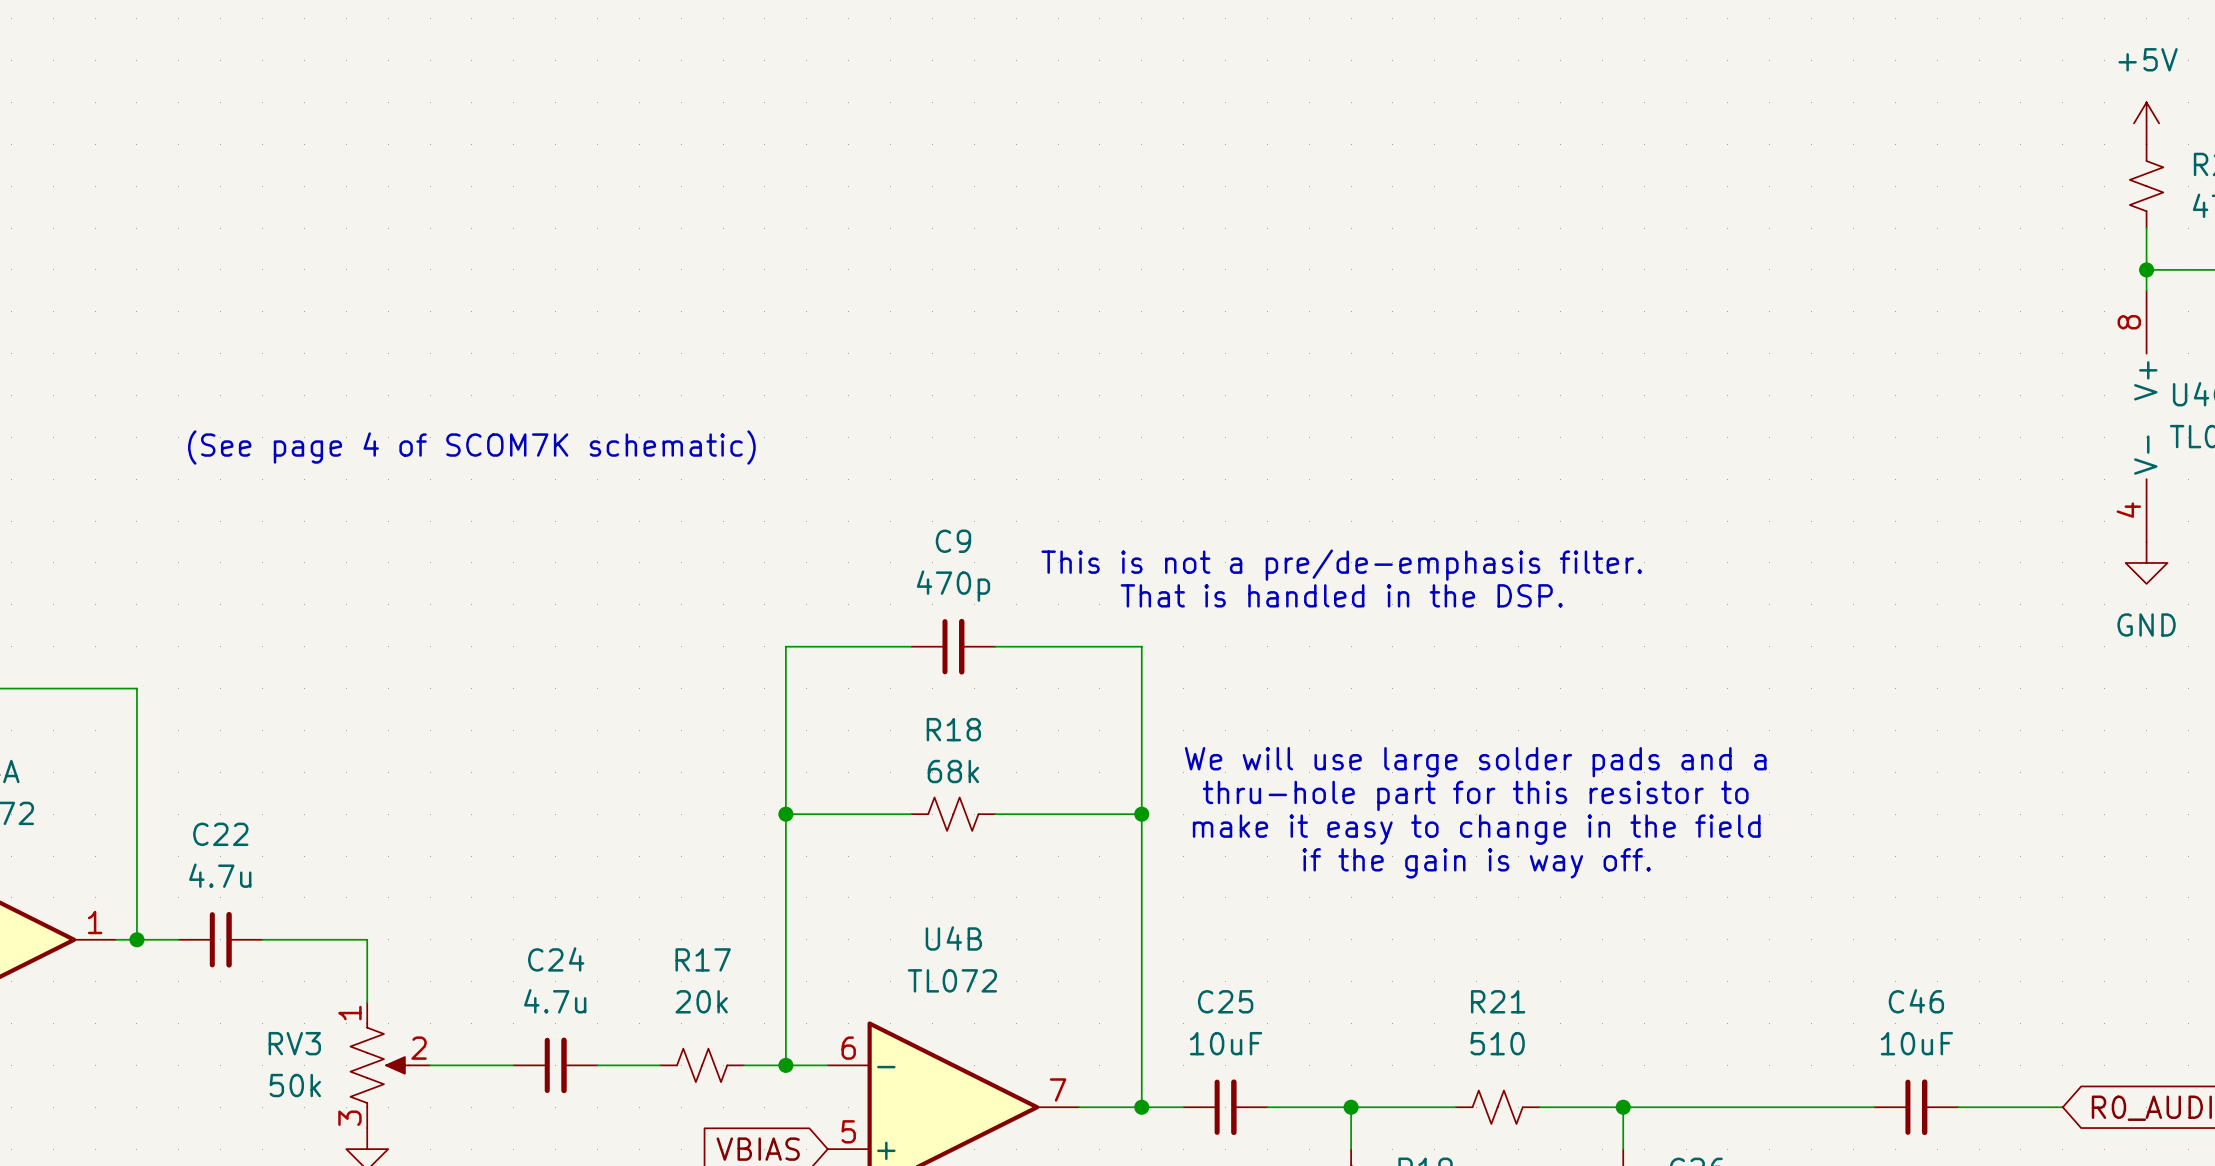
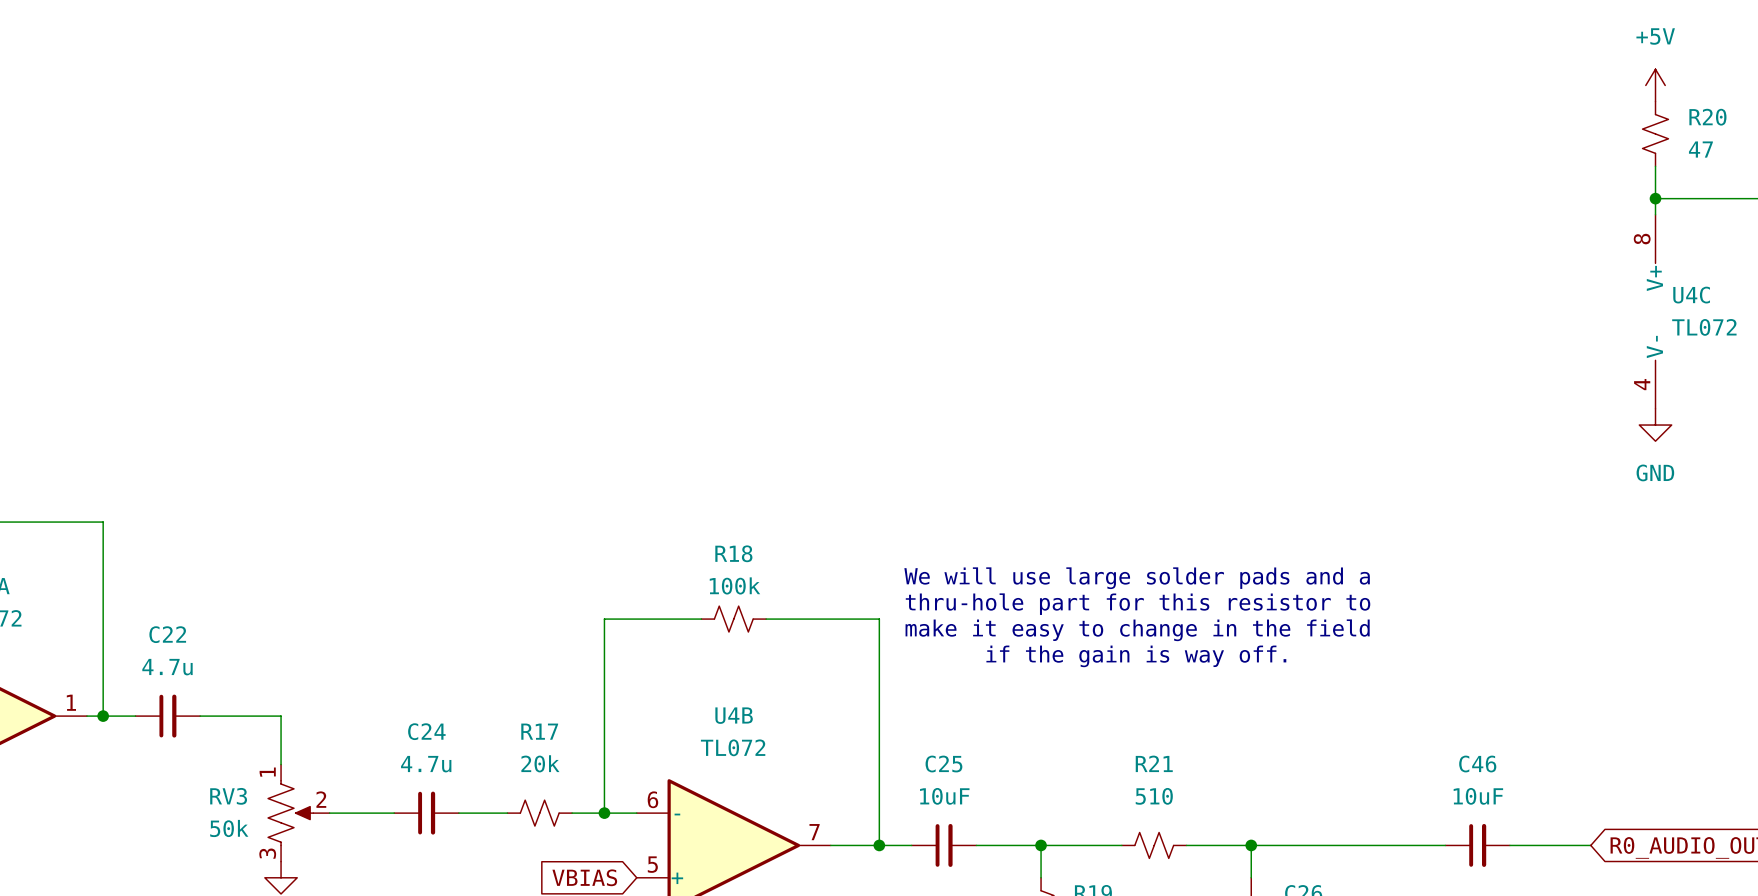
text: (See page 4 of SCOM7K schematic) (471, 447) -> none
text: This is not a pre/de-emphasis filter. (1341, 565) -> none
text: That is handled in the DSP. (1341, 595) -> none
wire: (911, 646) (785, 646) (785, 814) -> none
C9: 470p (953, 646) -> none
wire: (995, 646) (1141, 646) (1141, 814) -> none
R18 value: 68k (953, 771) -> 100k (734, 585)
junction: (785, 814) -> none
junction: (1141, 814) -> none

